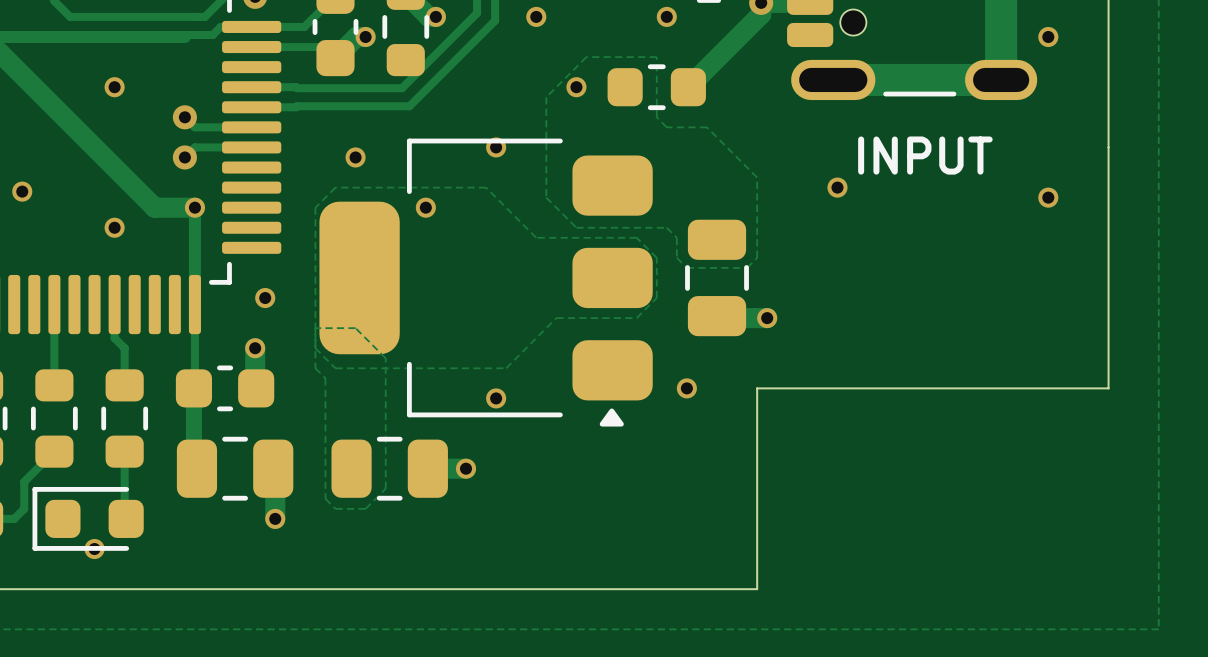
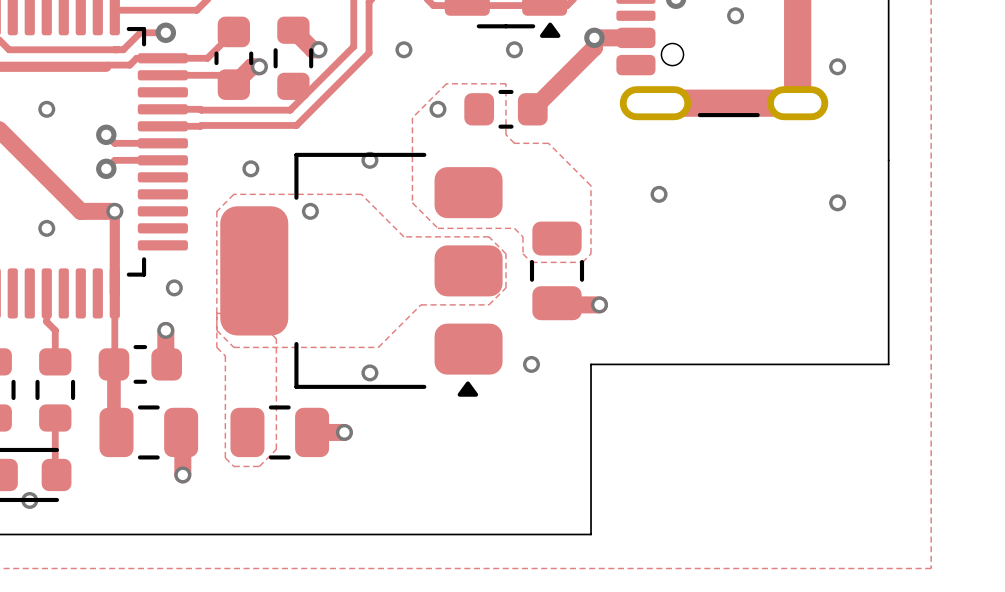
text: INPUT (925, 155) -> none

